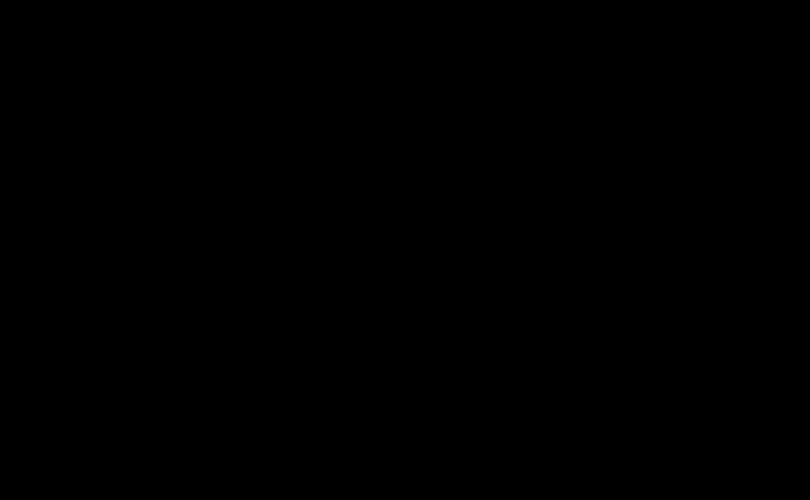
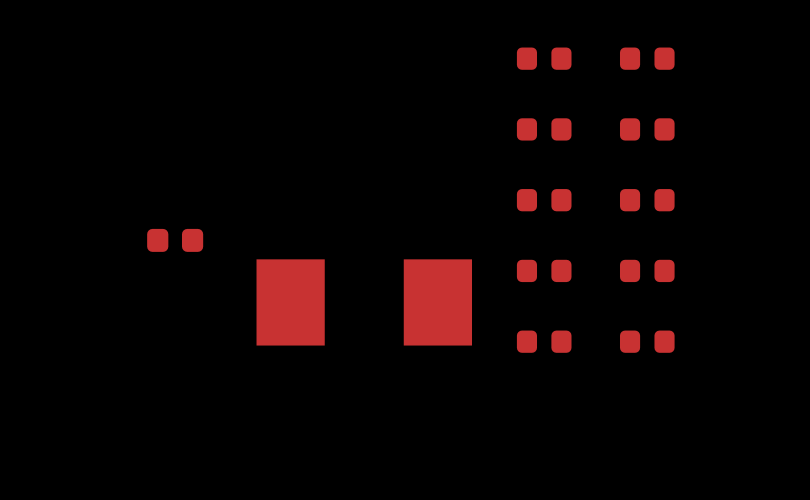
part: none -> (544, 58)
part: none -> (647, 58)
part: none -> (544, 129)
part: none -> (647, 129)
part: none -> (544, 200)
part: none -> (647, 200)
part: none -> (175, 240)
part: none -> (544, 270)
part: none -> (647, 270)
part: none -> (364, 302)
part: none -> (544, 341)
part: none -> (647, 341)

